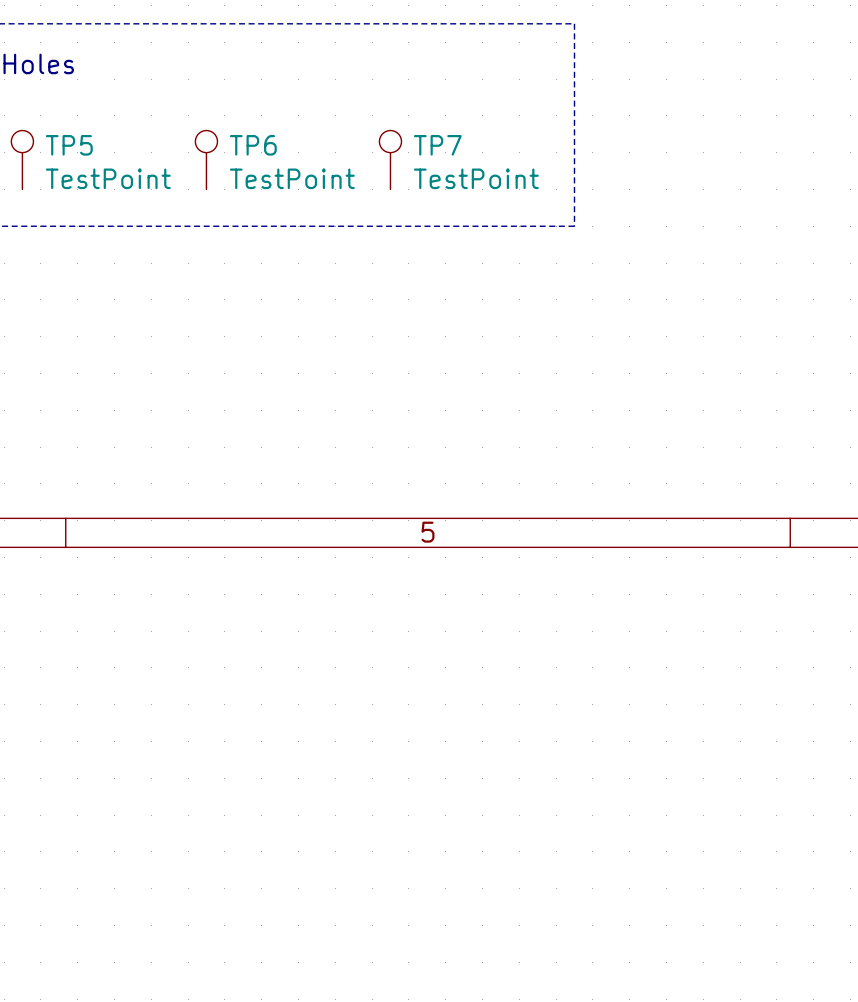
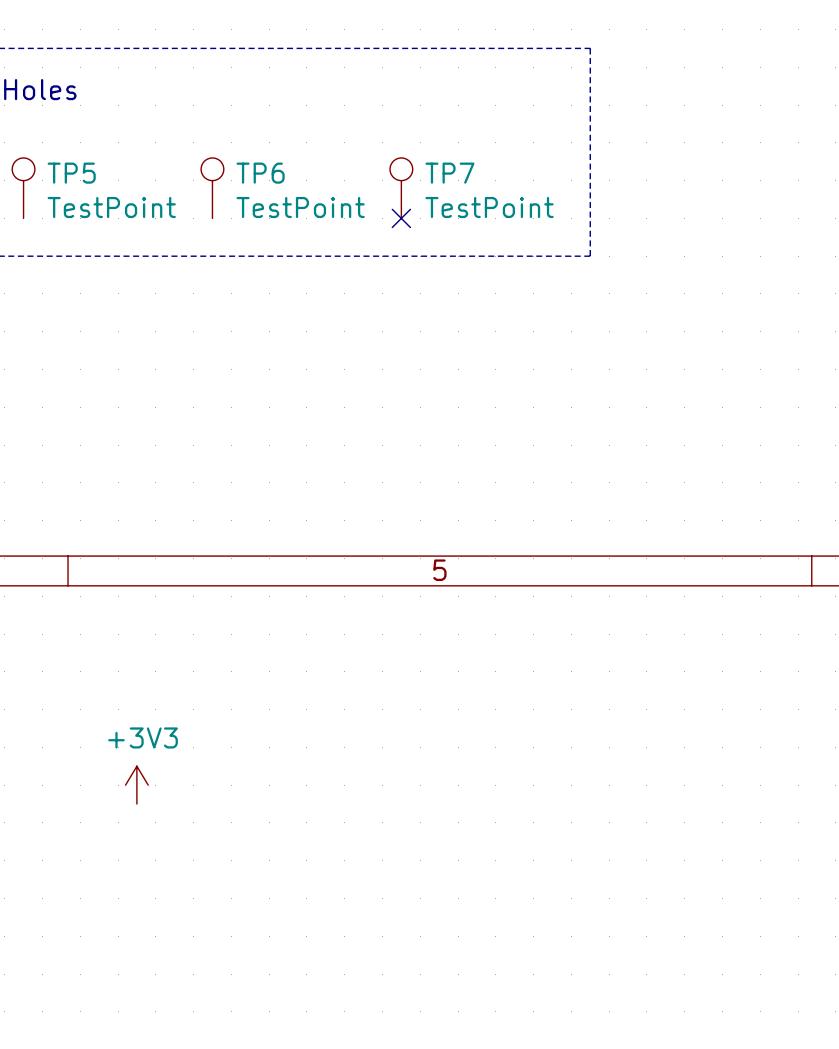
no-connect mark: none -> (401, 218)
power symbol: none -> +3V3 (136, 785)

